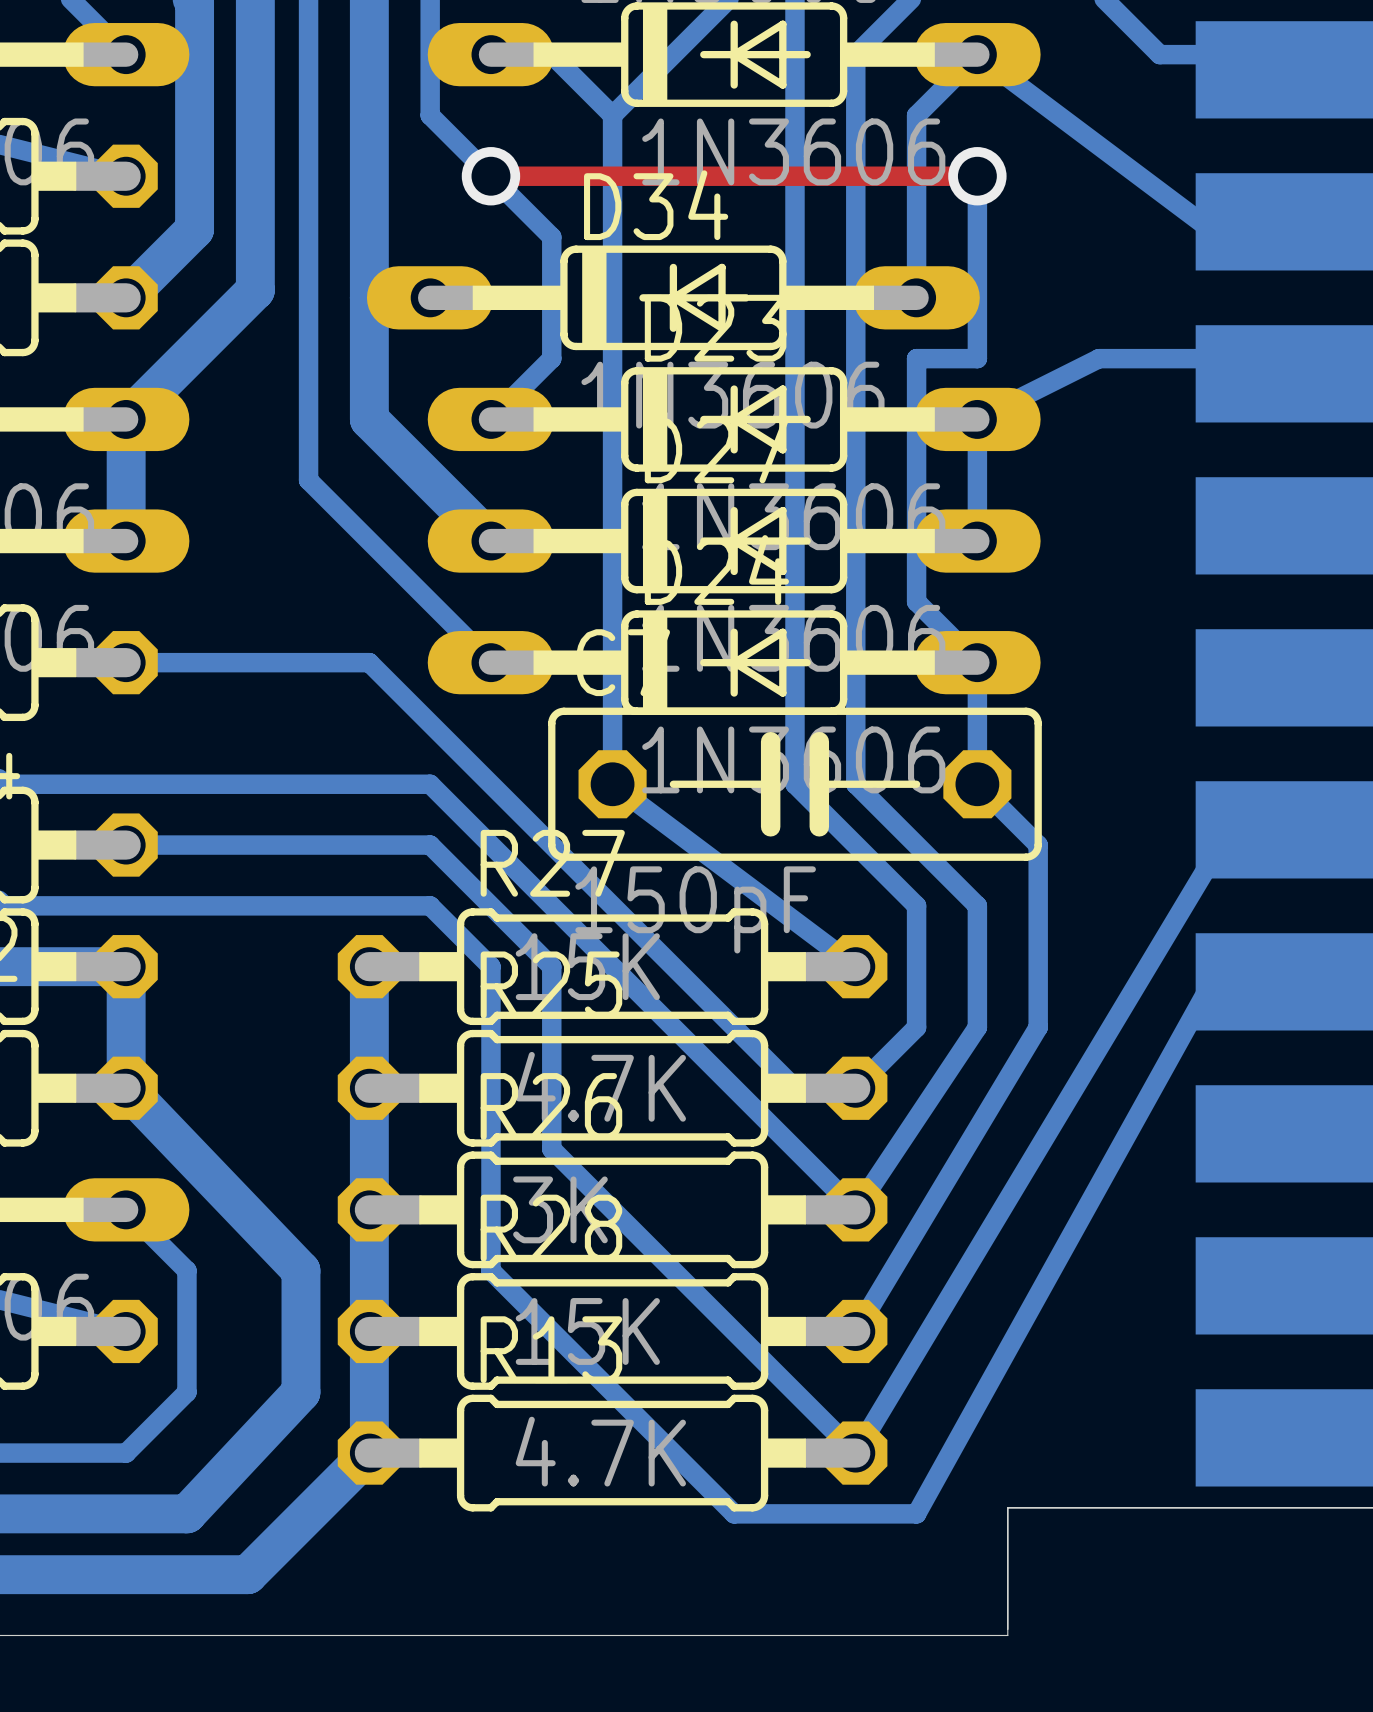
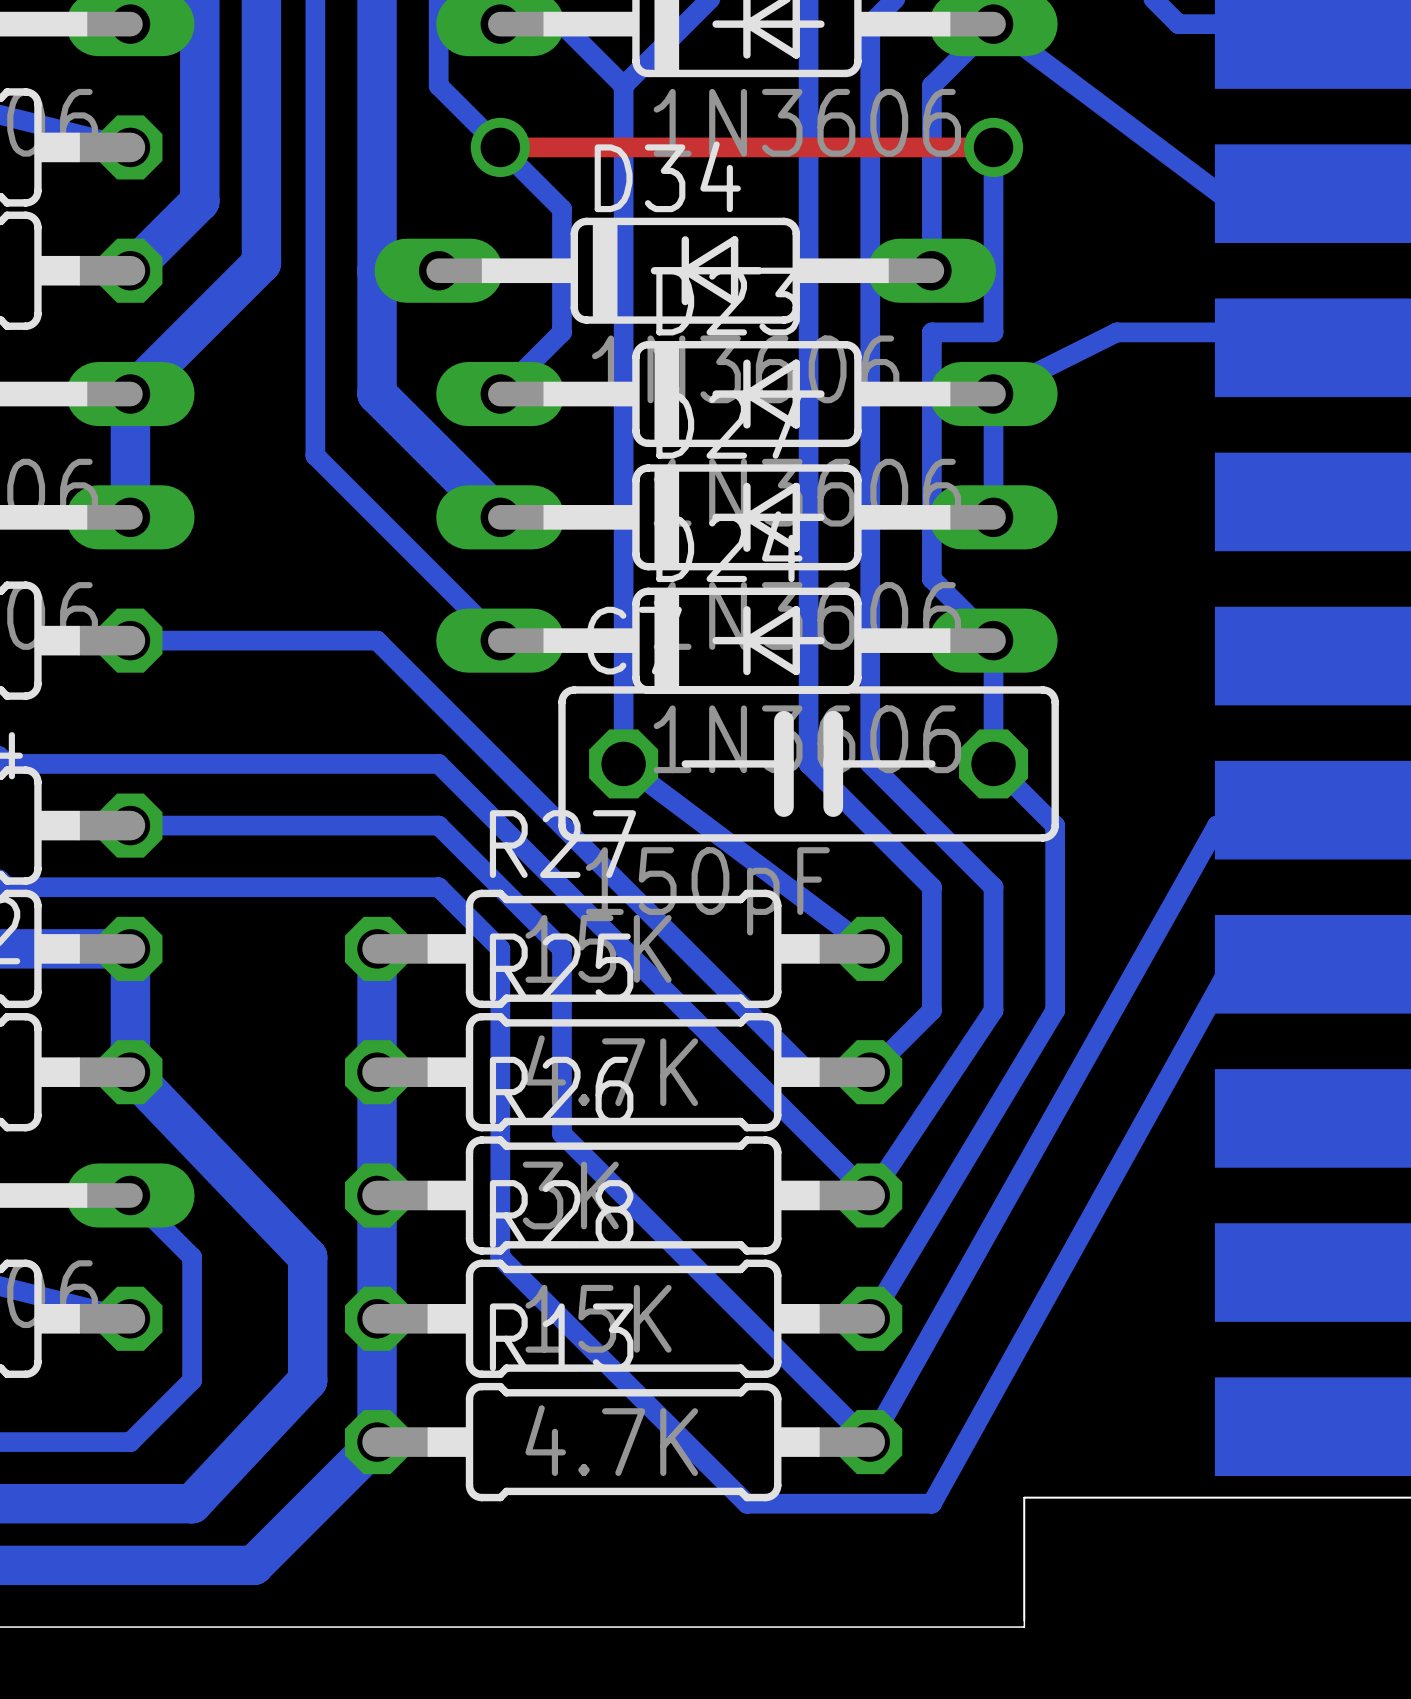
bottom track: (1220, 845) (855, 1453) -> (1240, 825) (1217, 825) (870, 1442)

